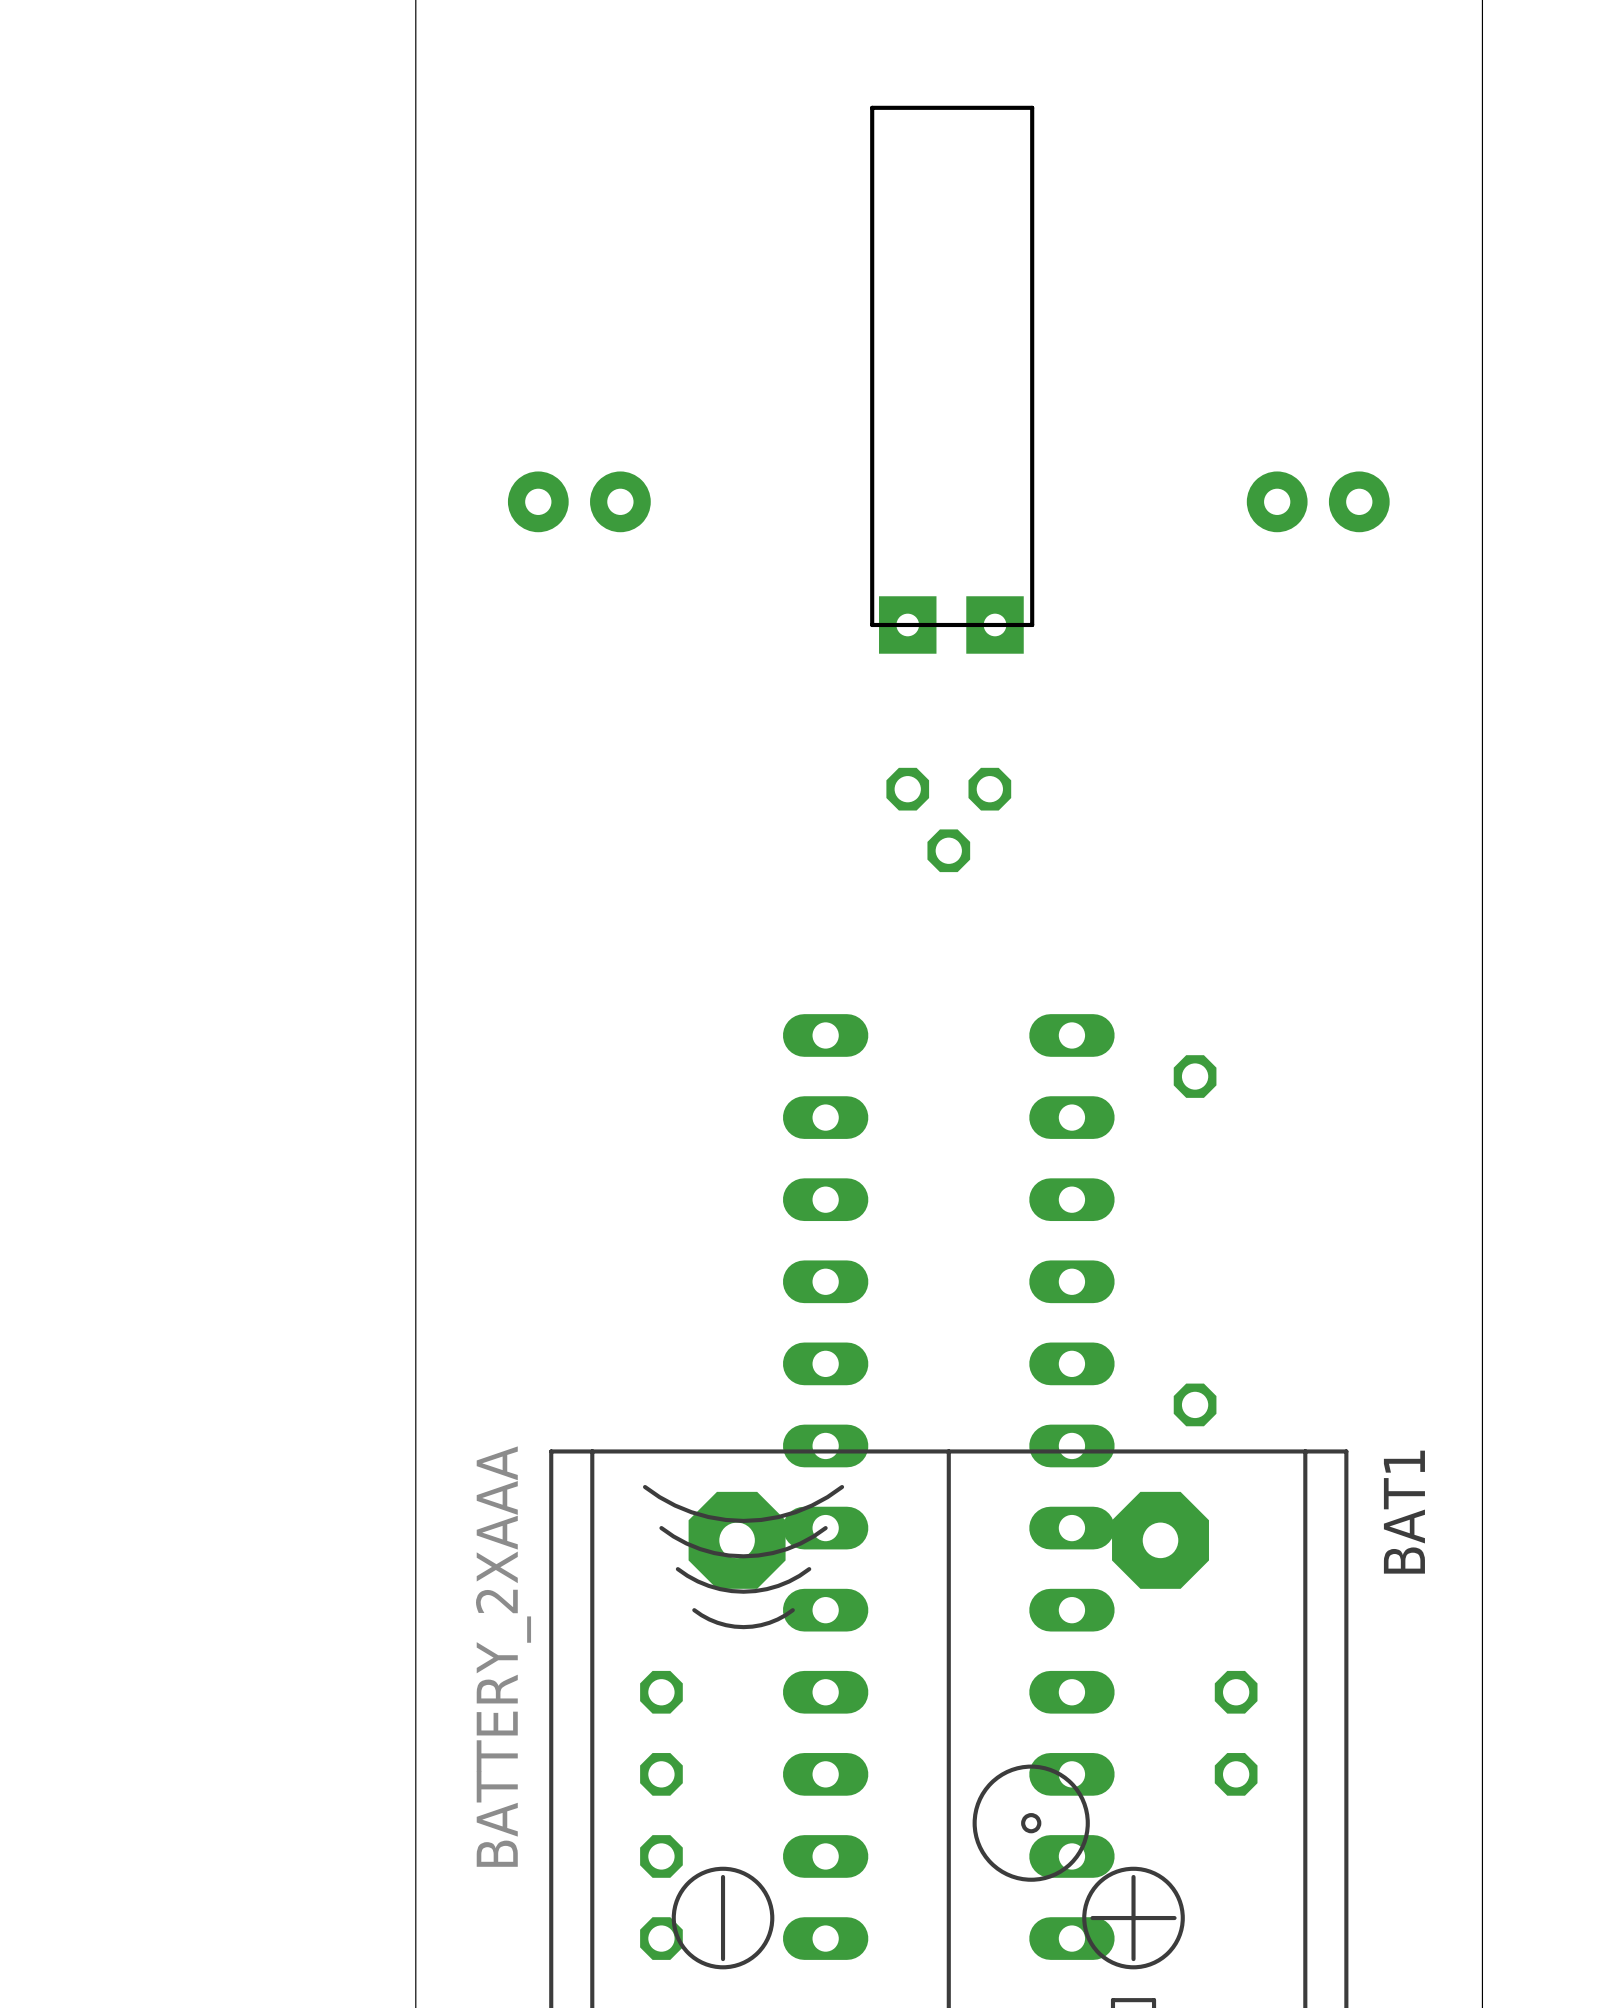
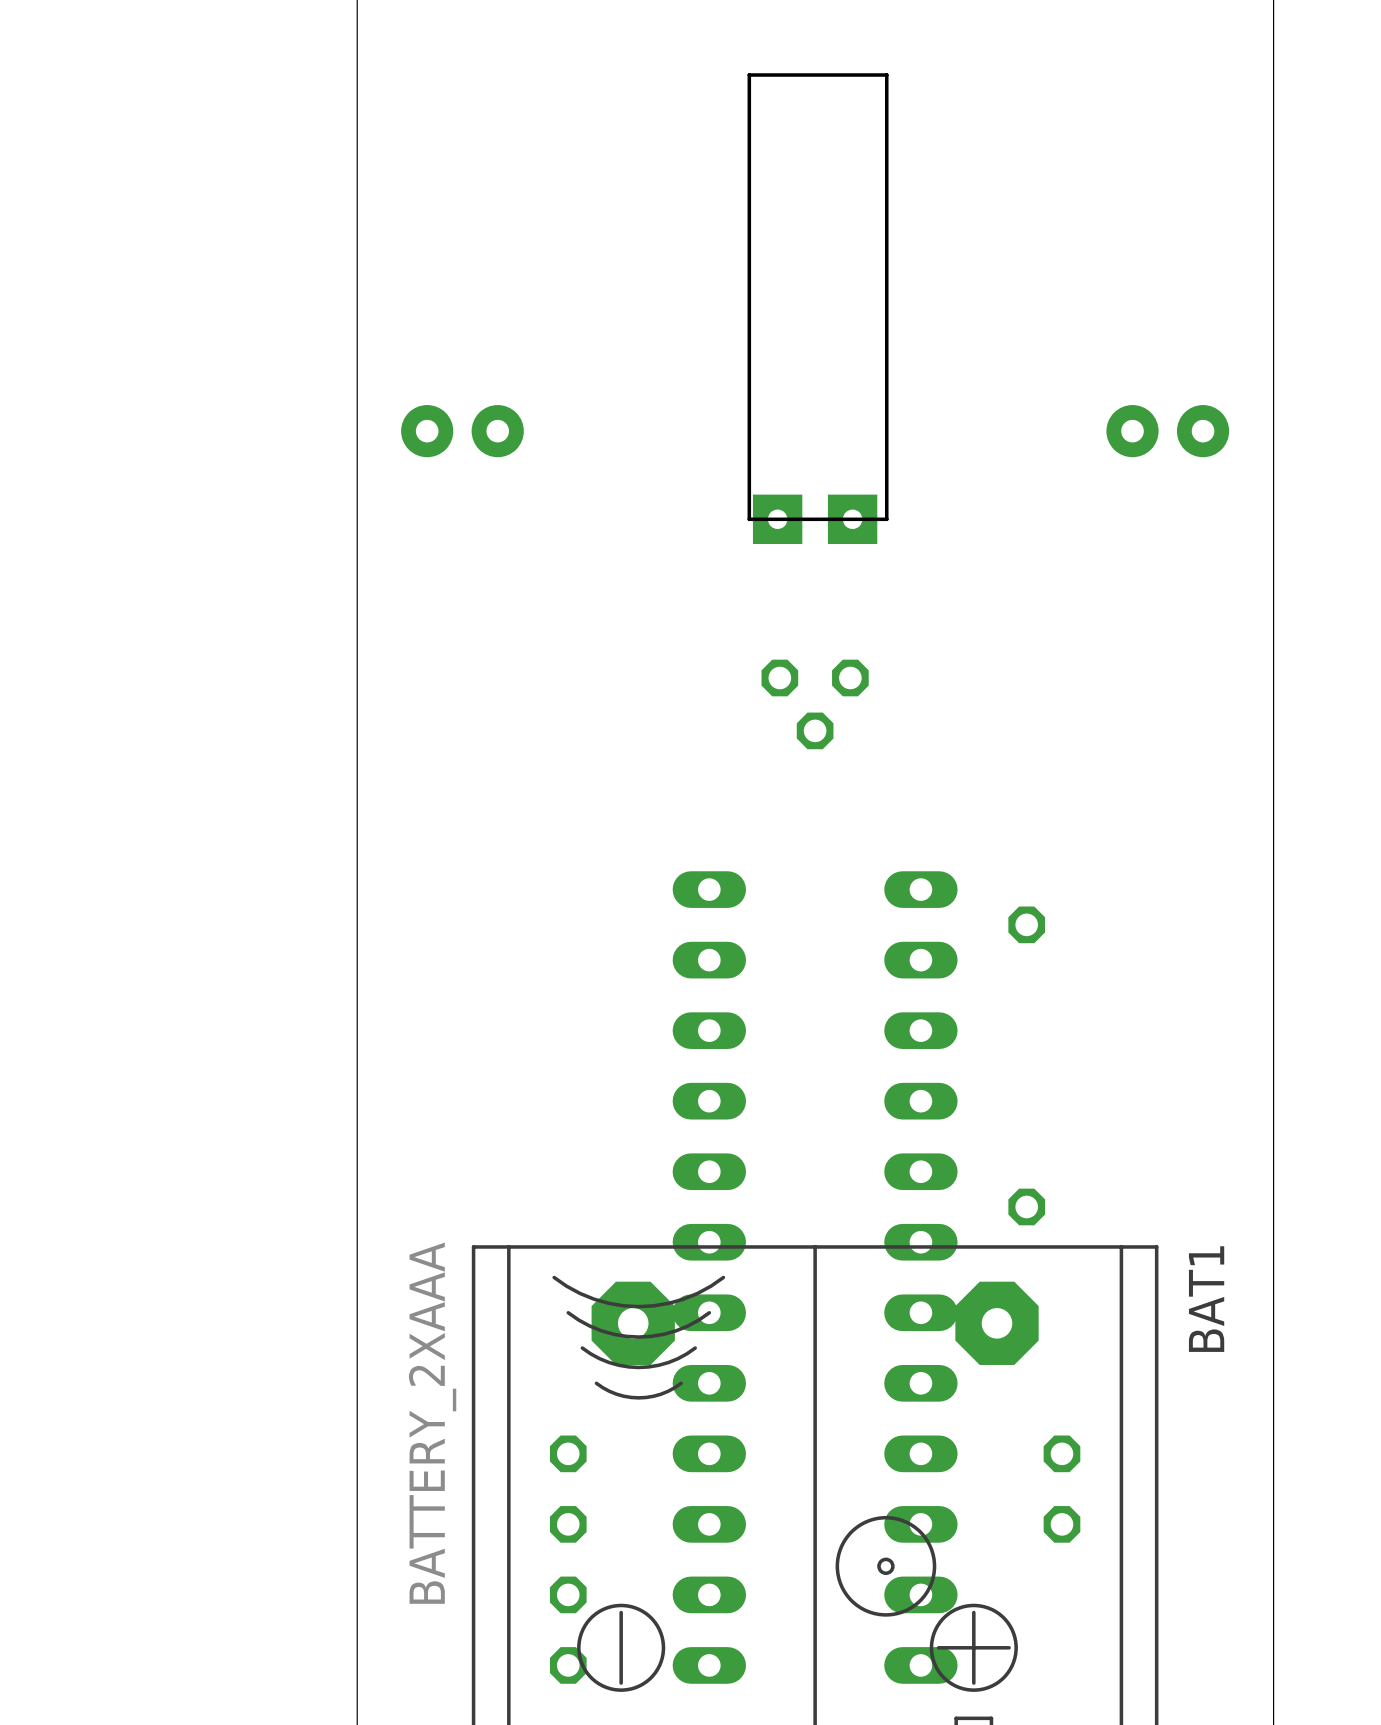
part footprint: [870, 105, 1035, 654] -> [747, 73, 889, 544]
part position: (579, 501) -> (462, 431)
part position: (1318, 501) -> (1167, 431)

